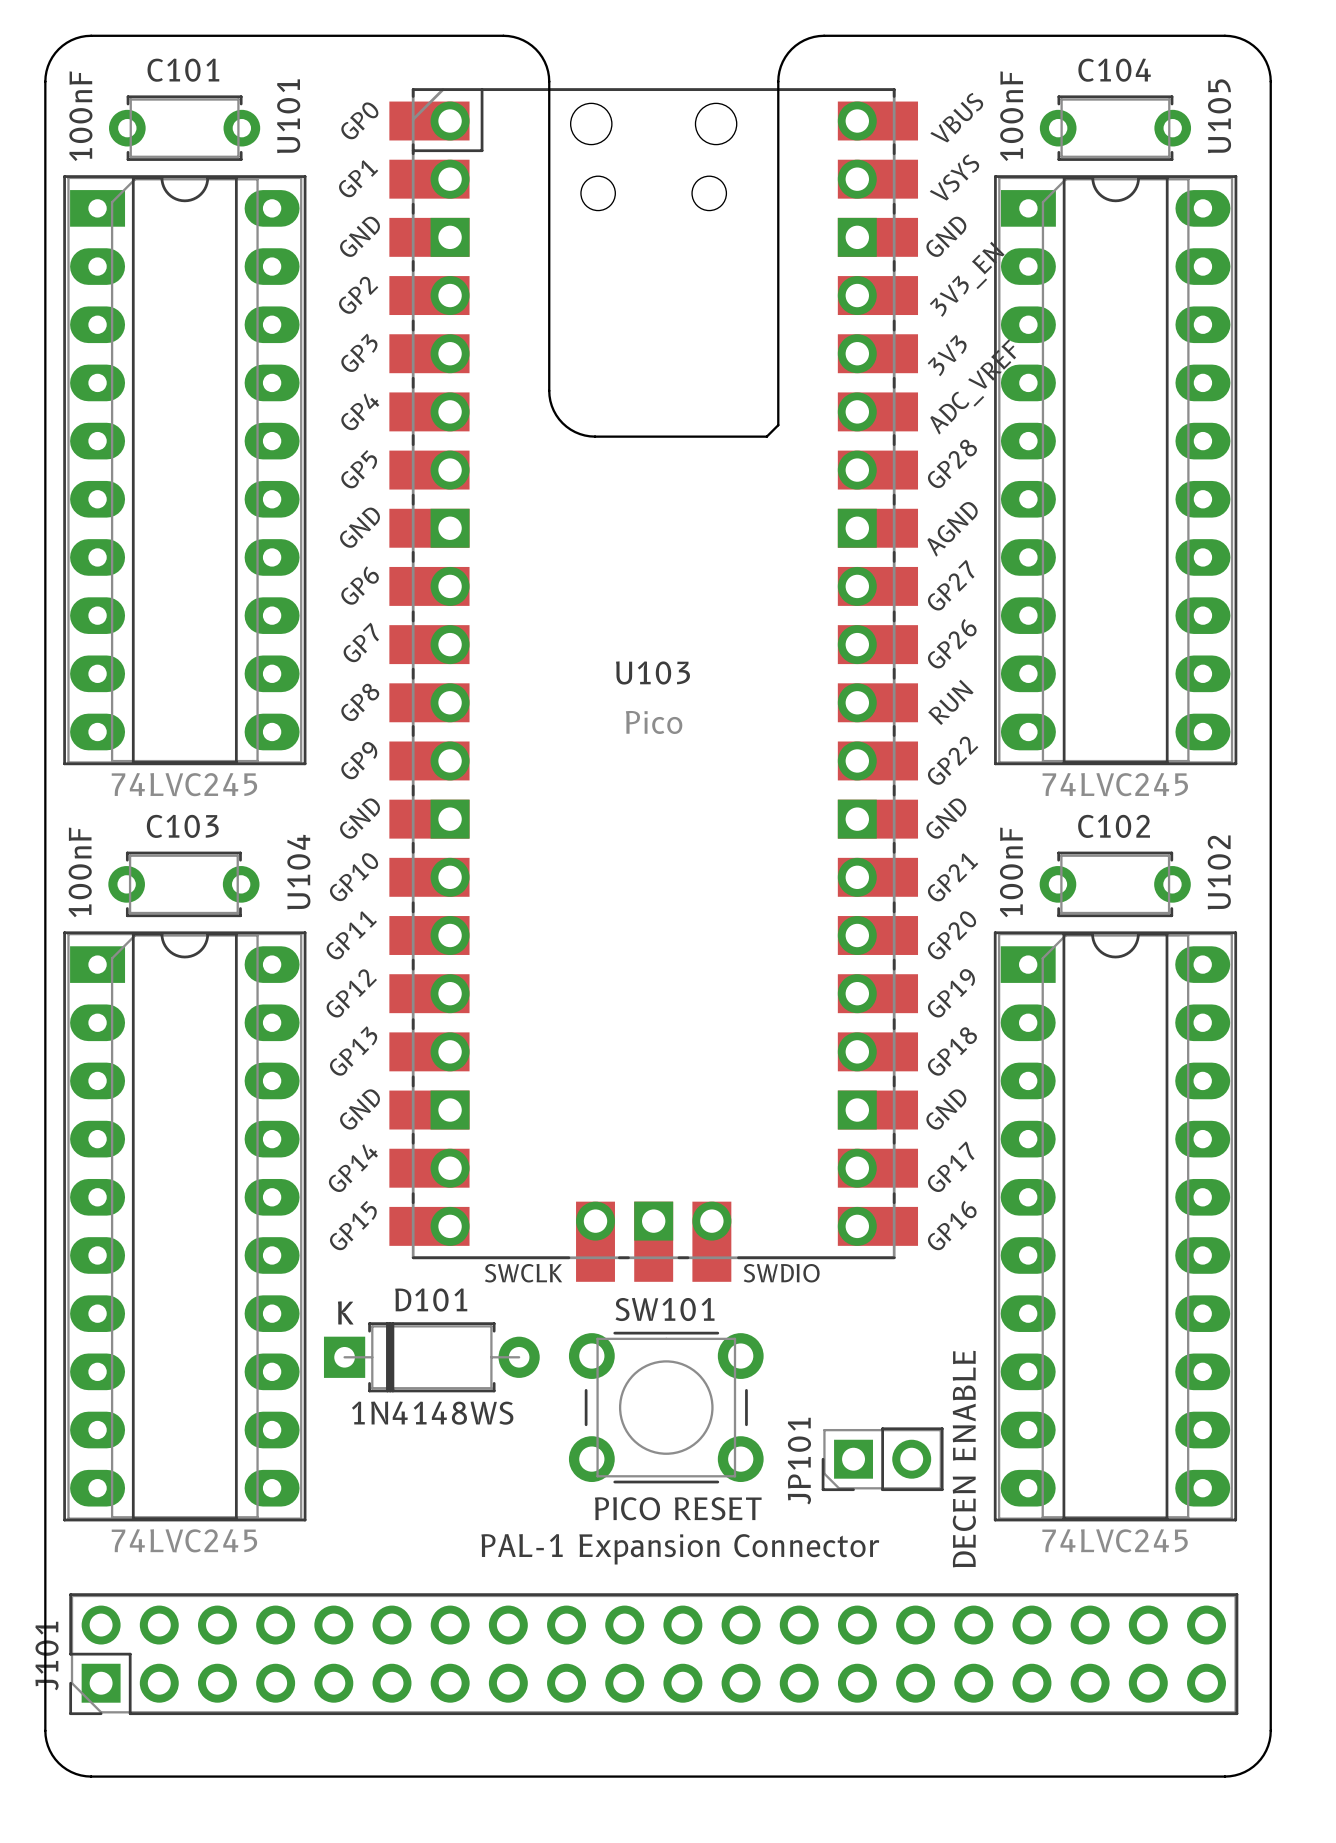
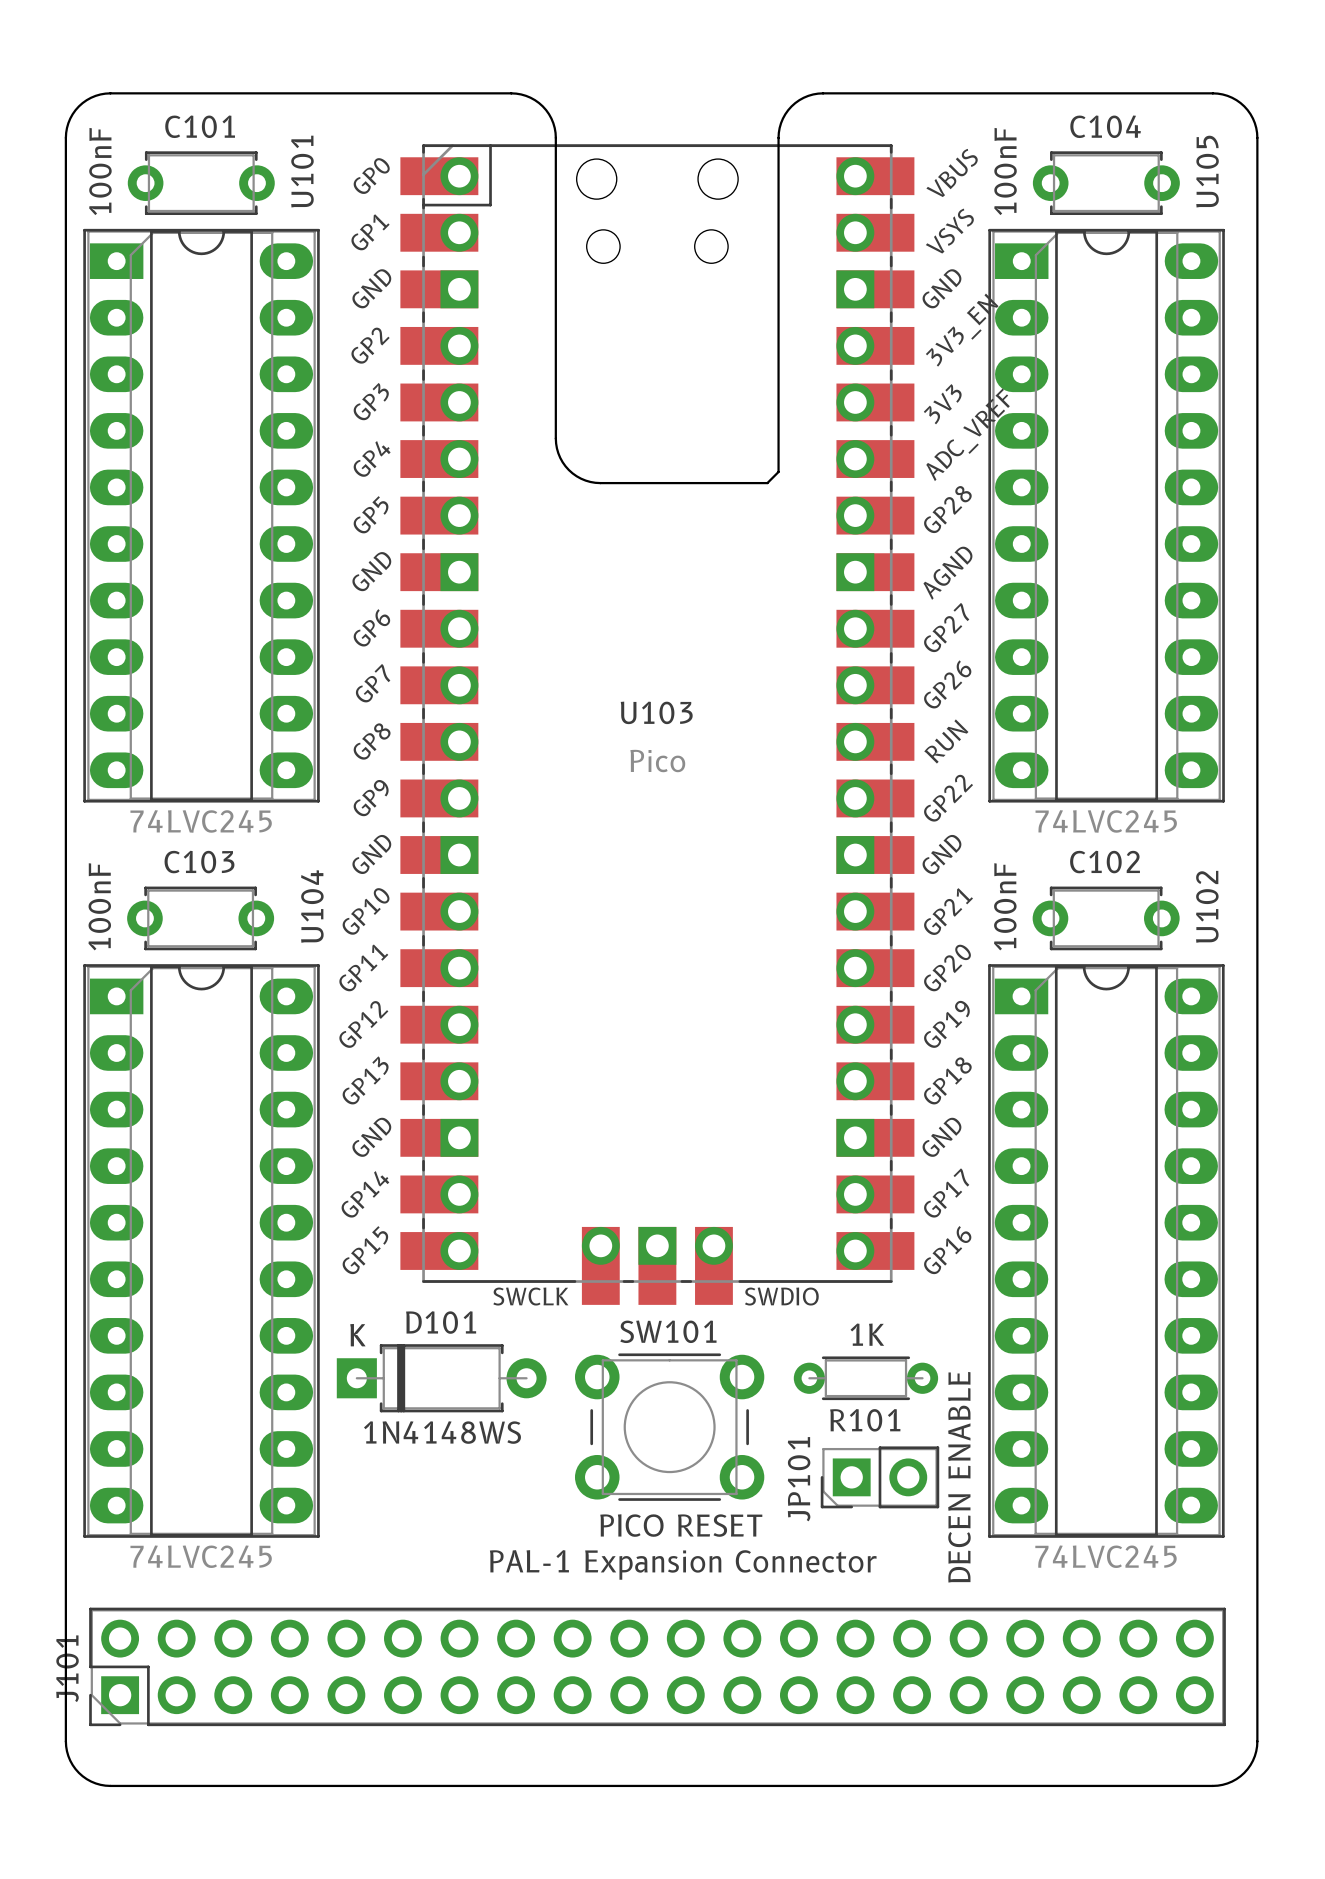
R101: none -> 1K (865, 1378)

